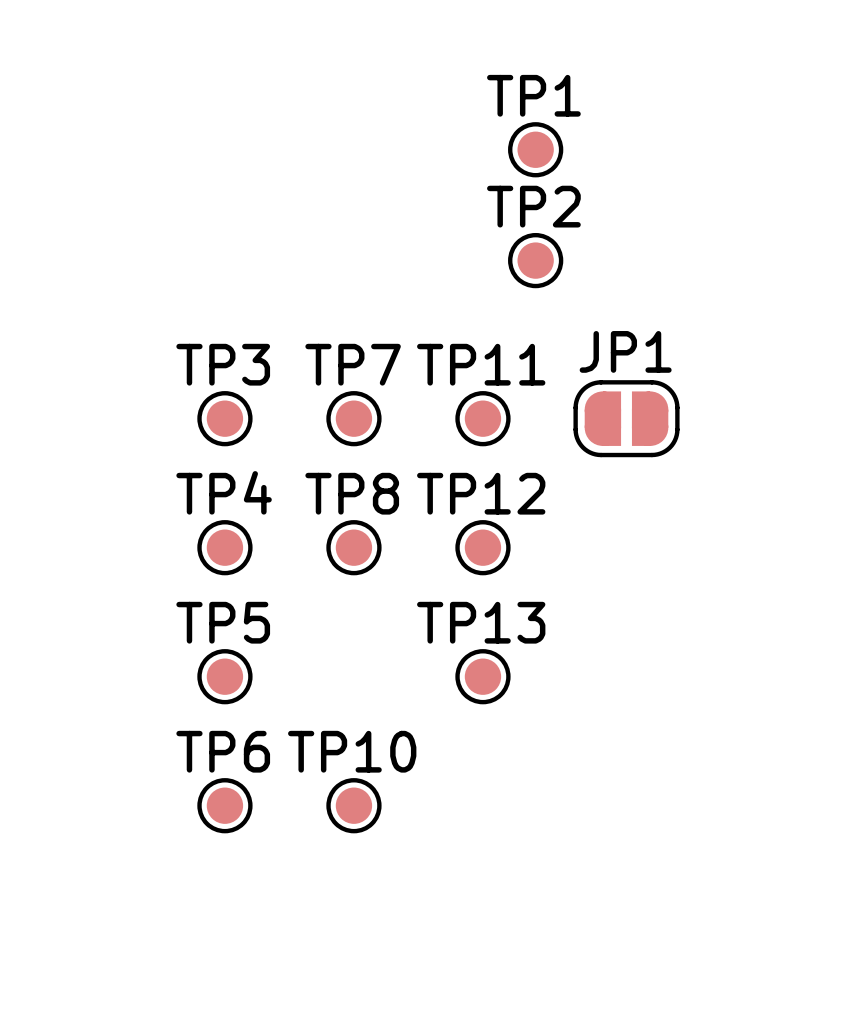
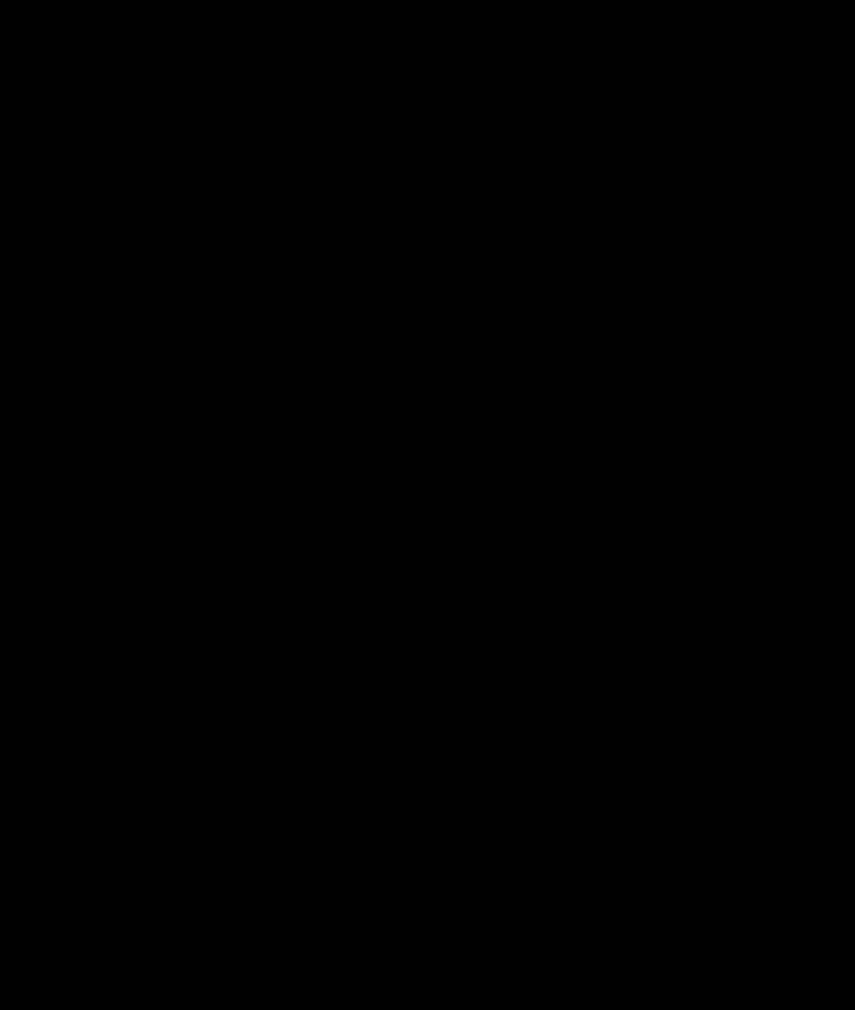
TP1: (535, 149) -> none
TP2: (535, 260) -> none
TP3: (224, 418) -> none
TP7: (353, 418) -> none
TP11: (482, 418) -> none
JP1: (626, 418) -> none
TP4: (224, 547) -> none
TP8: (353, 547) -> none
TP12: (482, 547) -> none
TP5: (224, 676) -> none
TP13: (482, 676) -> none
TP6: (224, 805) -> none
TP10: (353, 805) -> none

